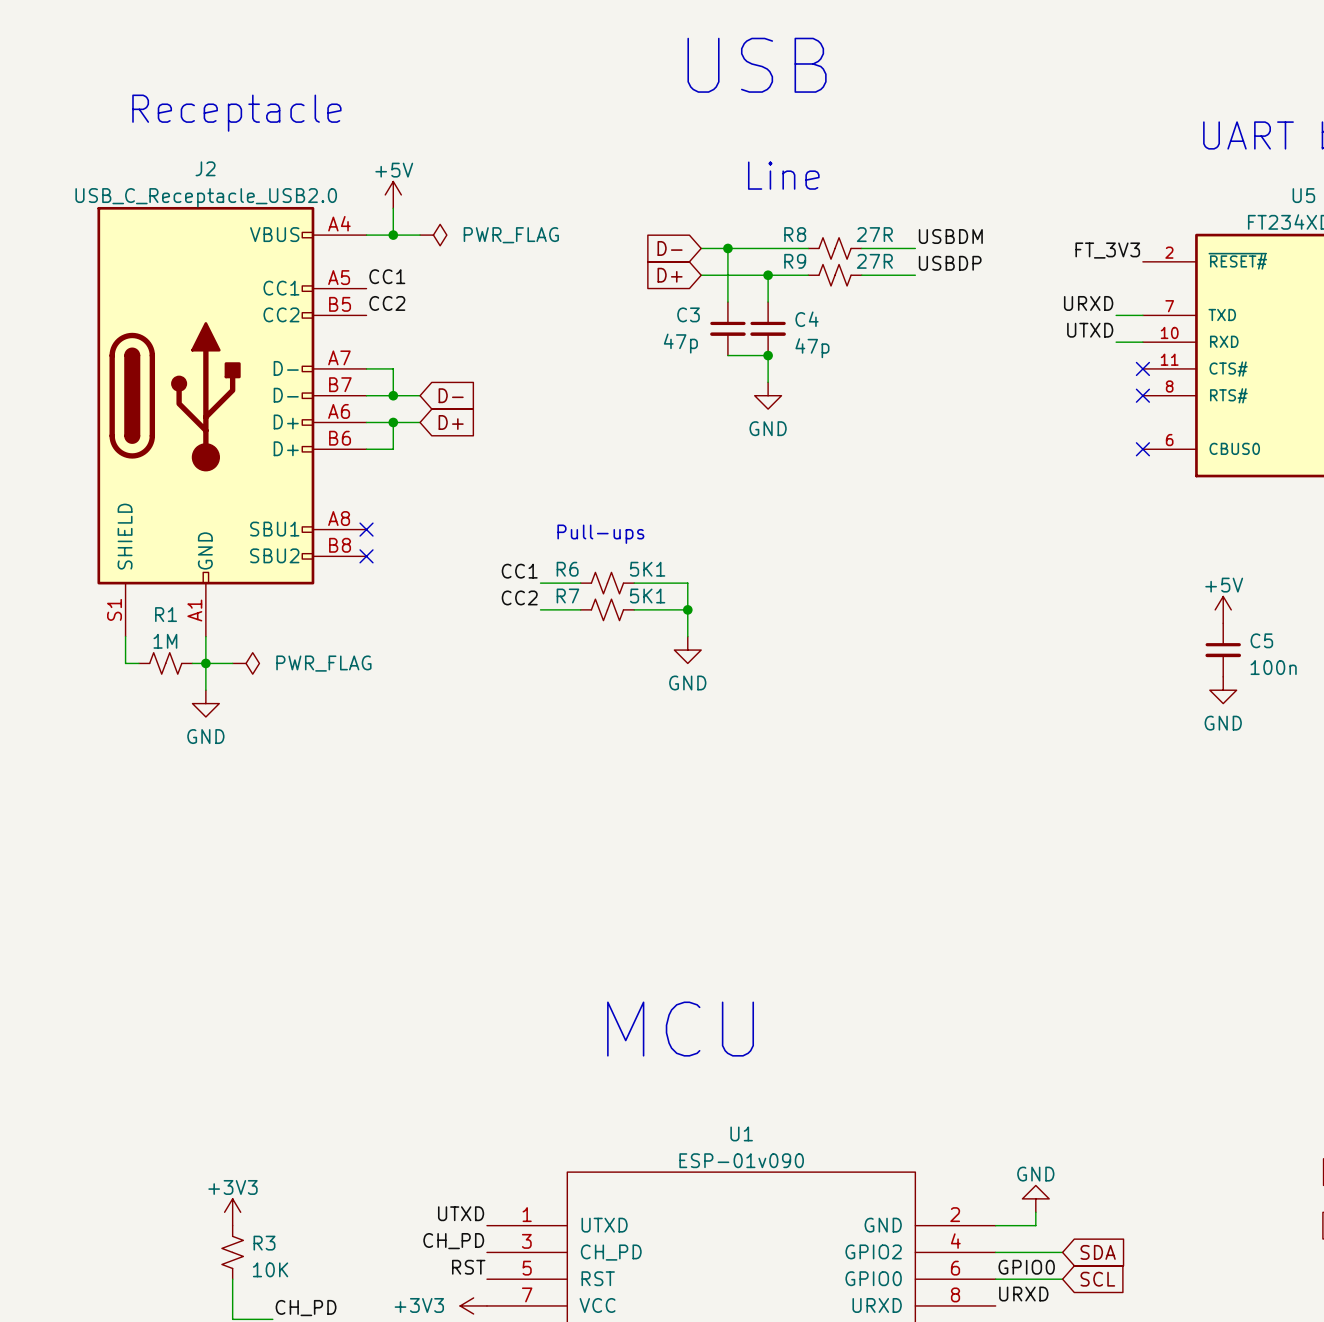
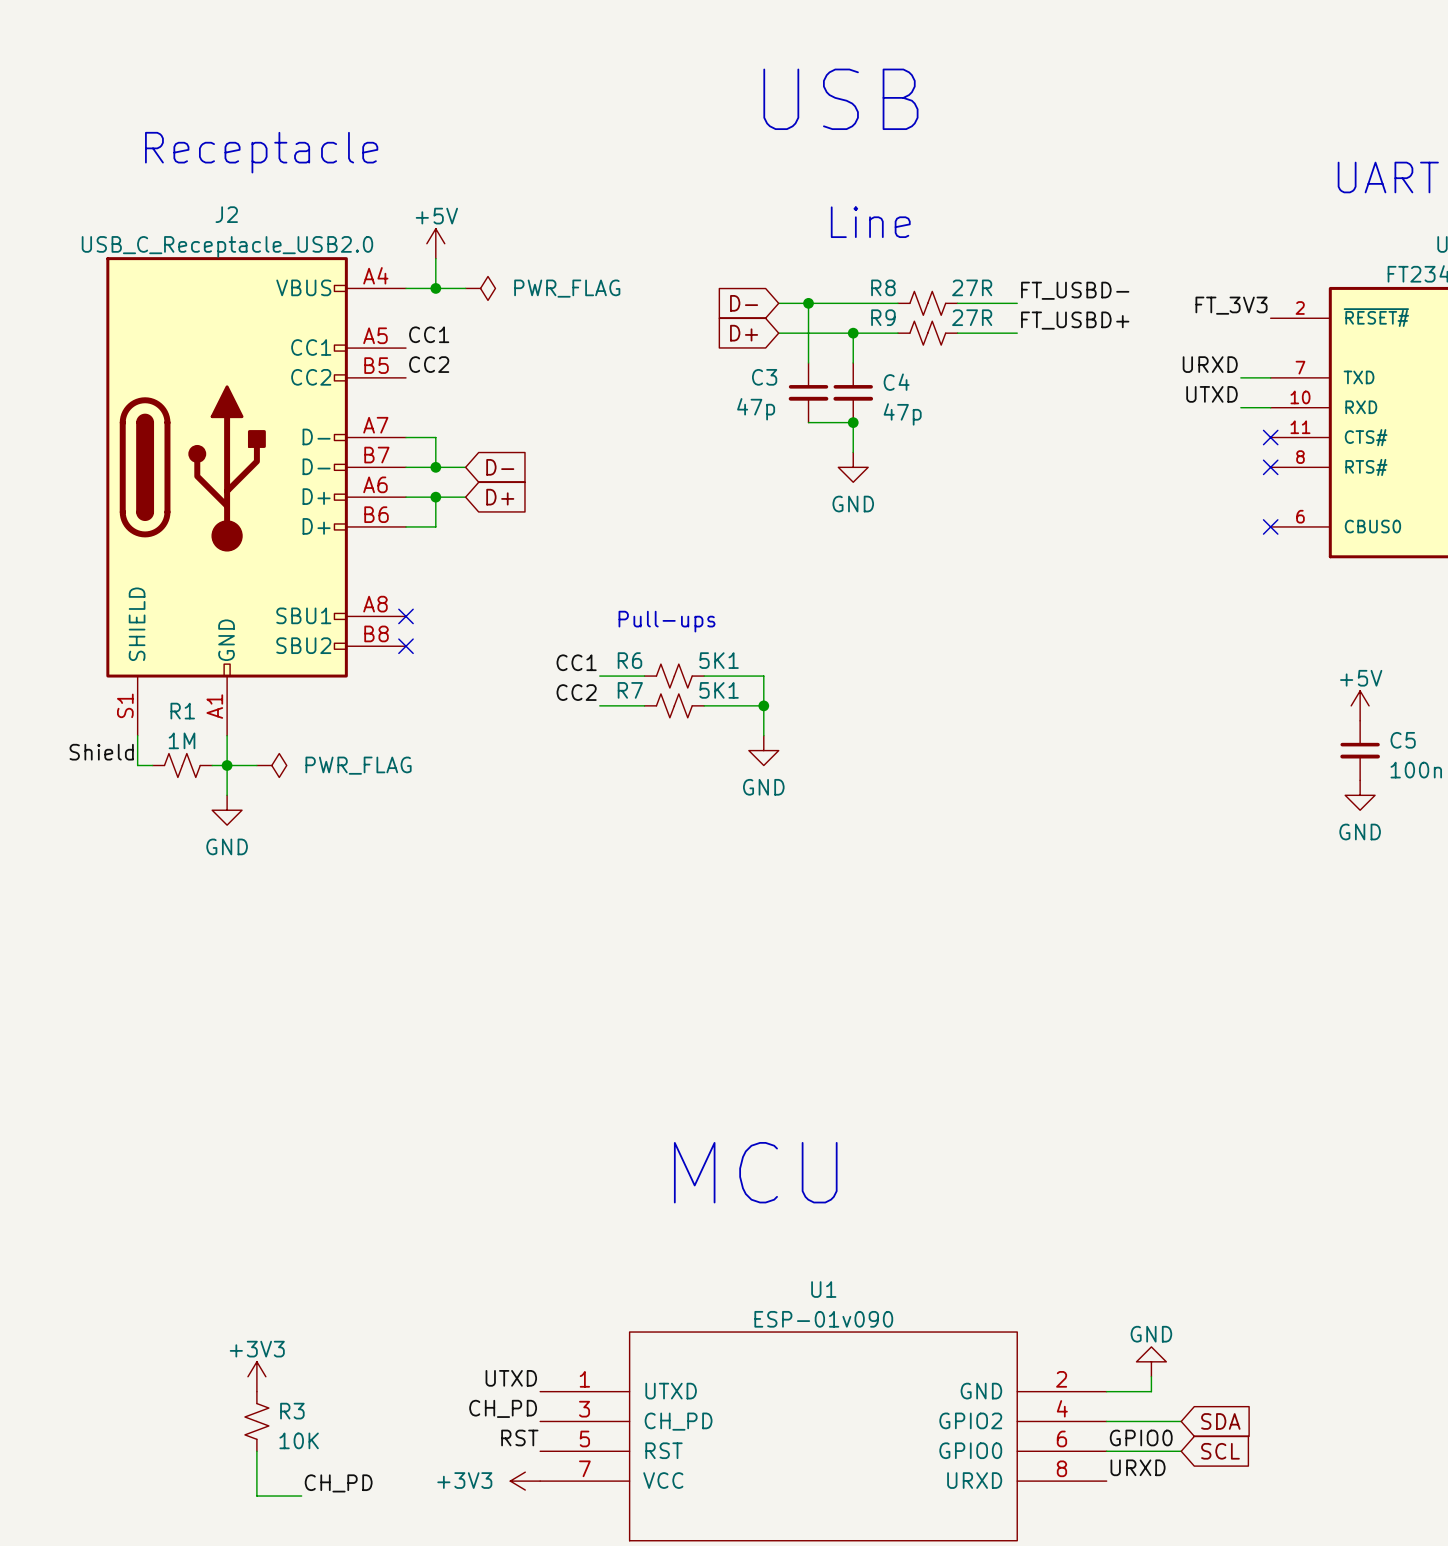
label: USBDM (950, 236) -> FT_USBD- (1075, 290)
label: USBDP (950, 263) -> FT_USBD+ (1075, 320)
label: none -> Shield (101, 752)

